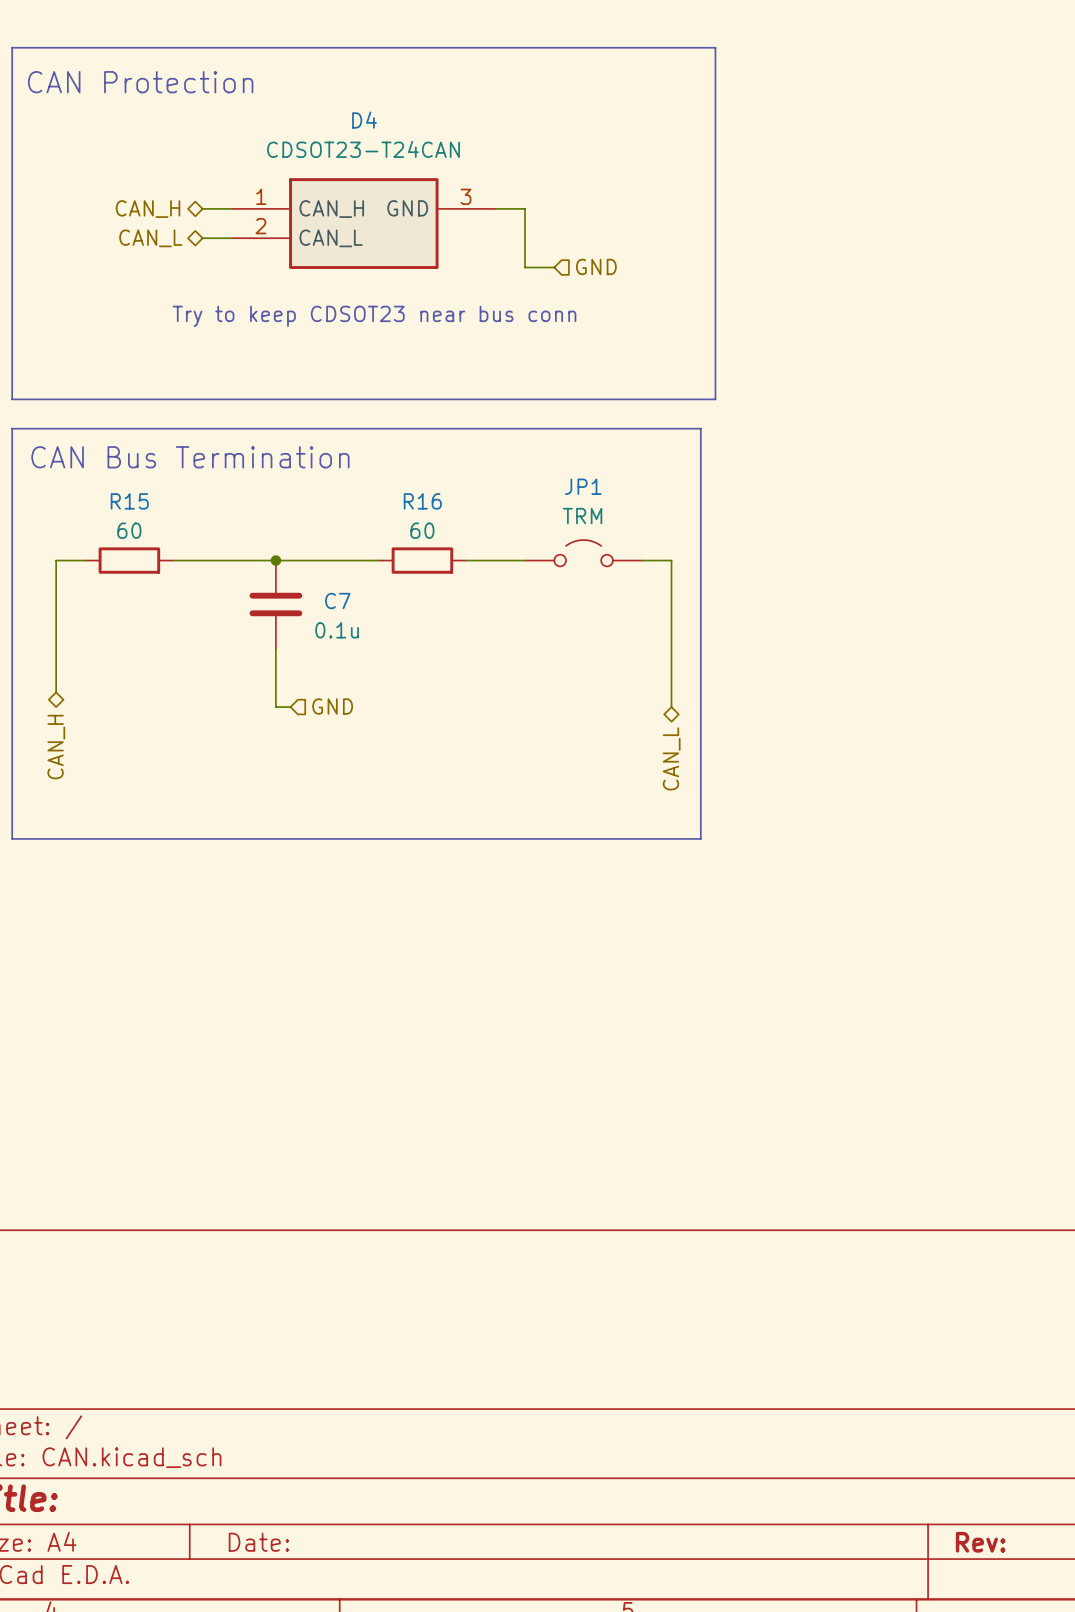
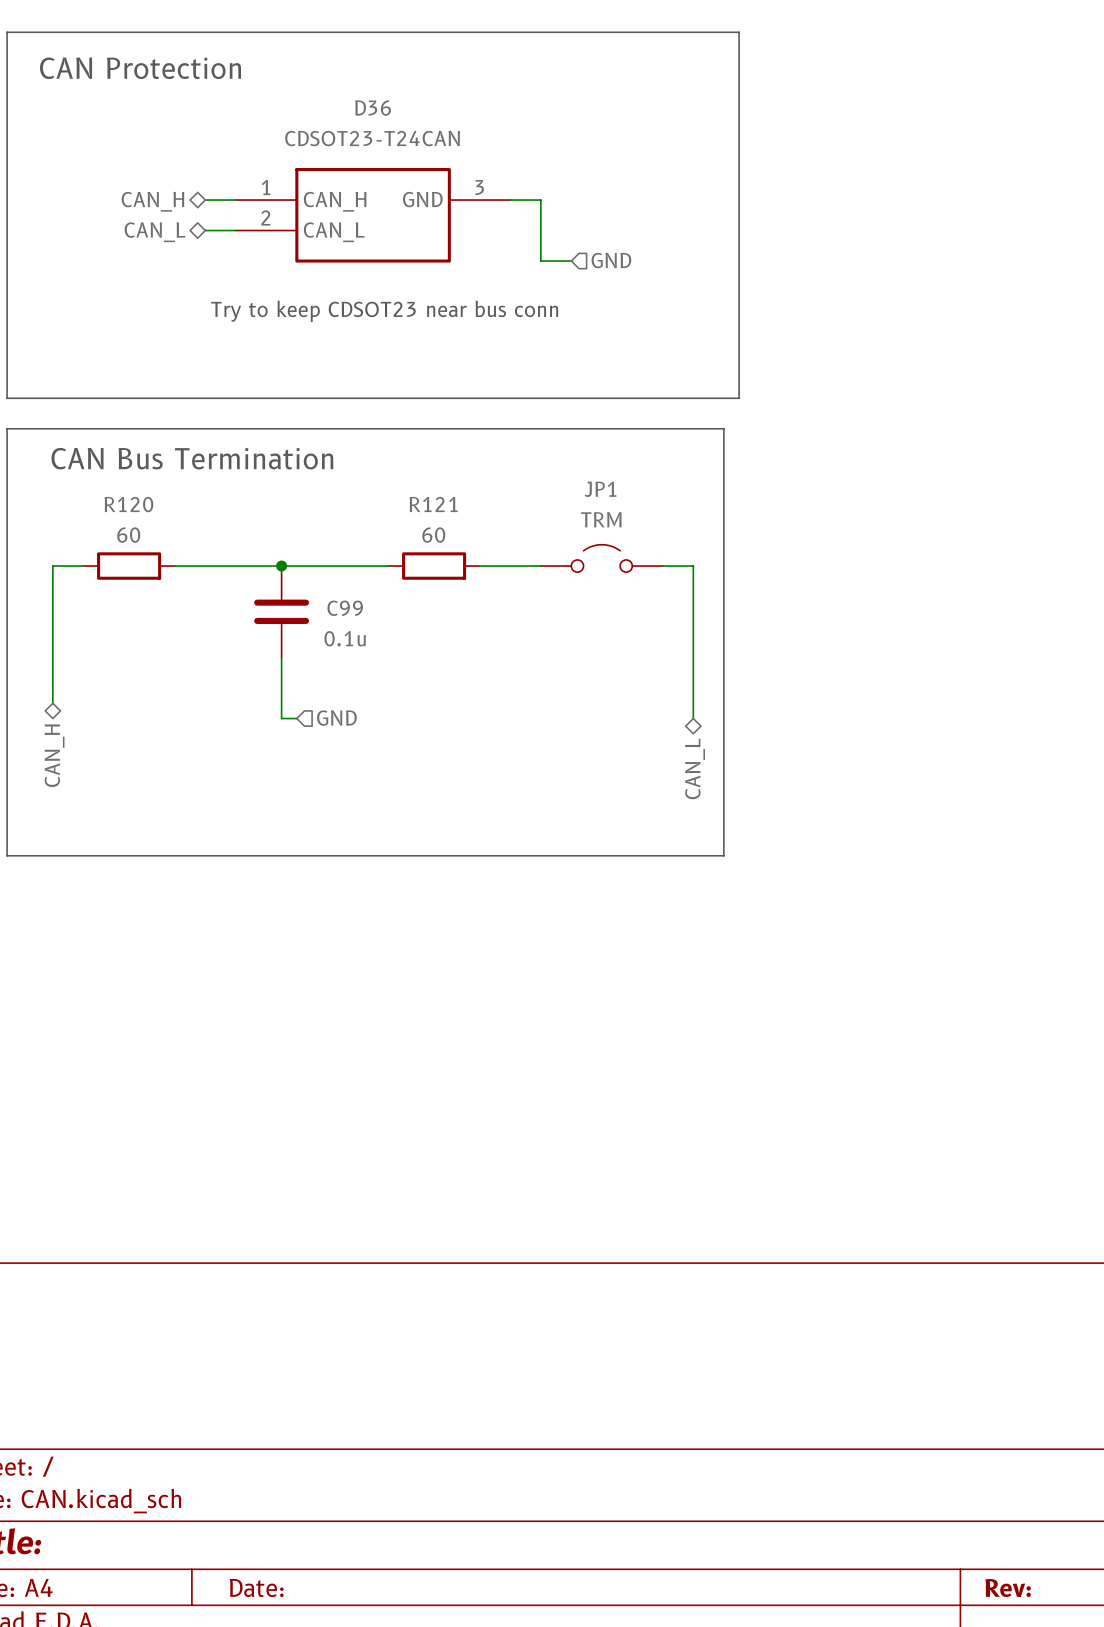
D4 name: D4 (364, 120) -> D36 (373, 108)
R15 name: R15 (129, 501) -> R120 (128, 504)
R16 name: R16 (422, 501) -> R121 (433, 504)
C7 name: C7 (337, 601) -> C99 (345, 608)

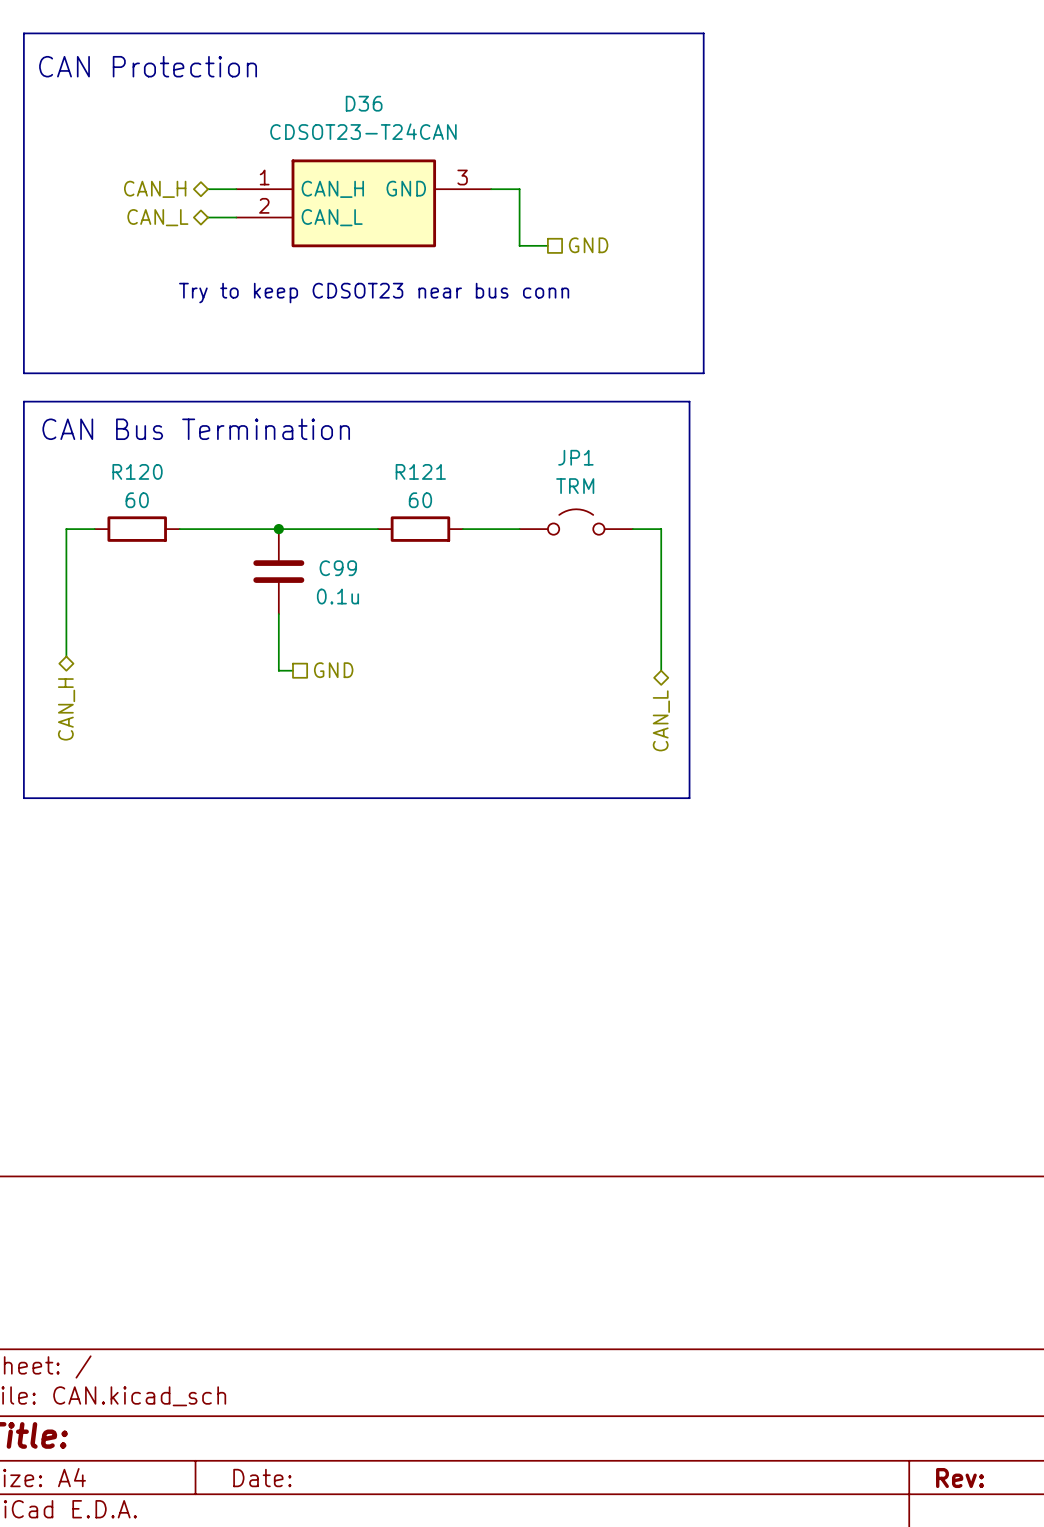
hierarchical label shape: input (611, 260) -> passive (588, 245)
hierarchical label shape: input (336, 718) -> passive (333, 670)

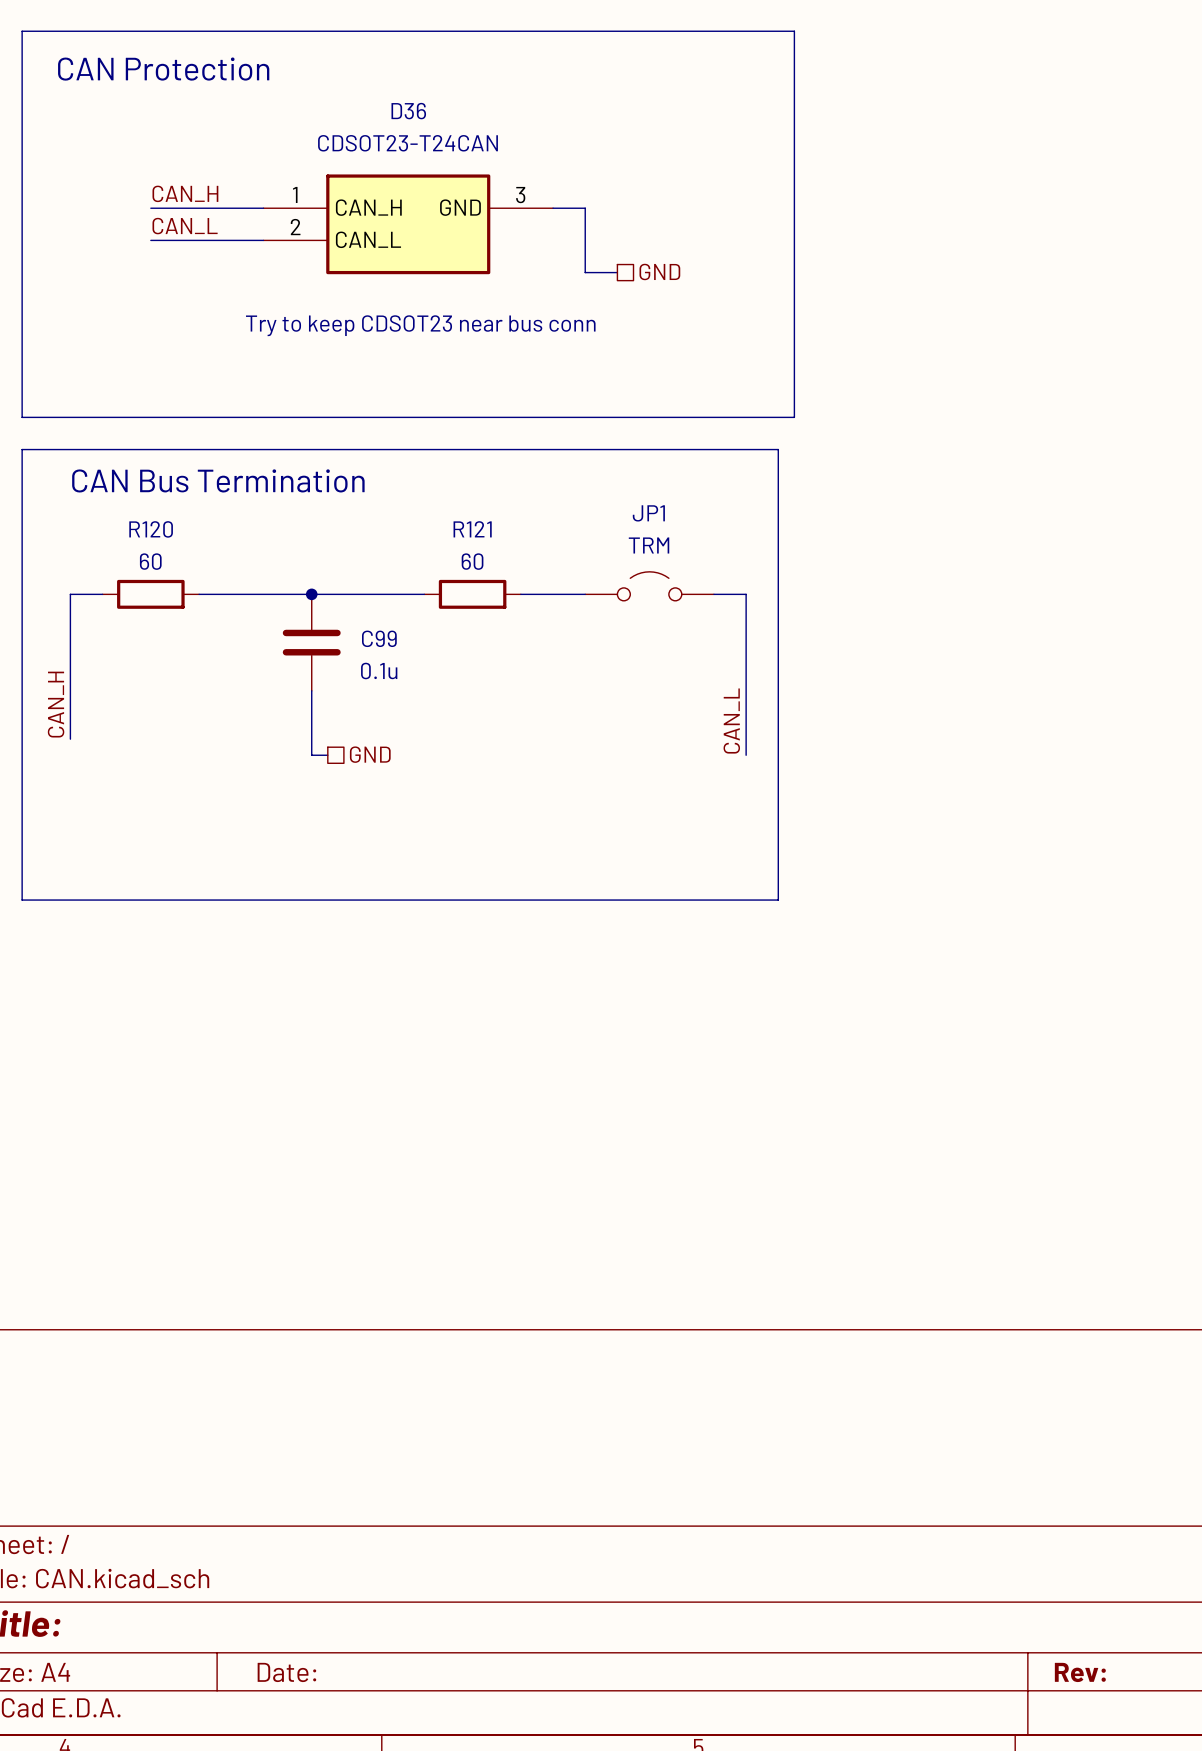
label: none -> CAN_H (185, 193)
wire: none -> (150, 208) (231, 208)
hierarchical label: CAN_H (155, 189) -> none
label: none -> CAN_L (185, 226)
wire: none -> (150, 240) (231, 240)
hierarchical label: CAN_L (157, 217) -> none
label: none -> CAN_H (56, 704)
label: none -> CAN_L (731, 721)
hierarchical label: CAN_H (66, 709) -> none
hierarchical label: CAN_L (661, 720) -> none

